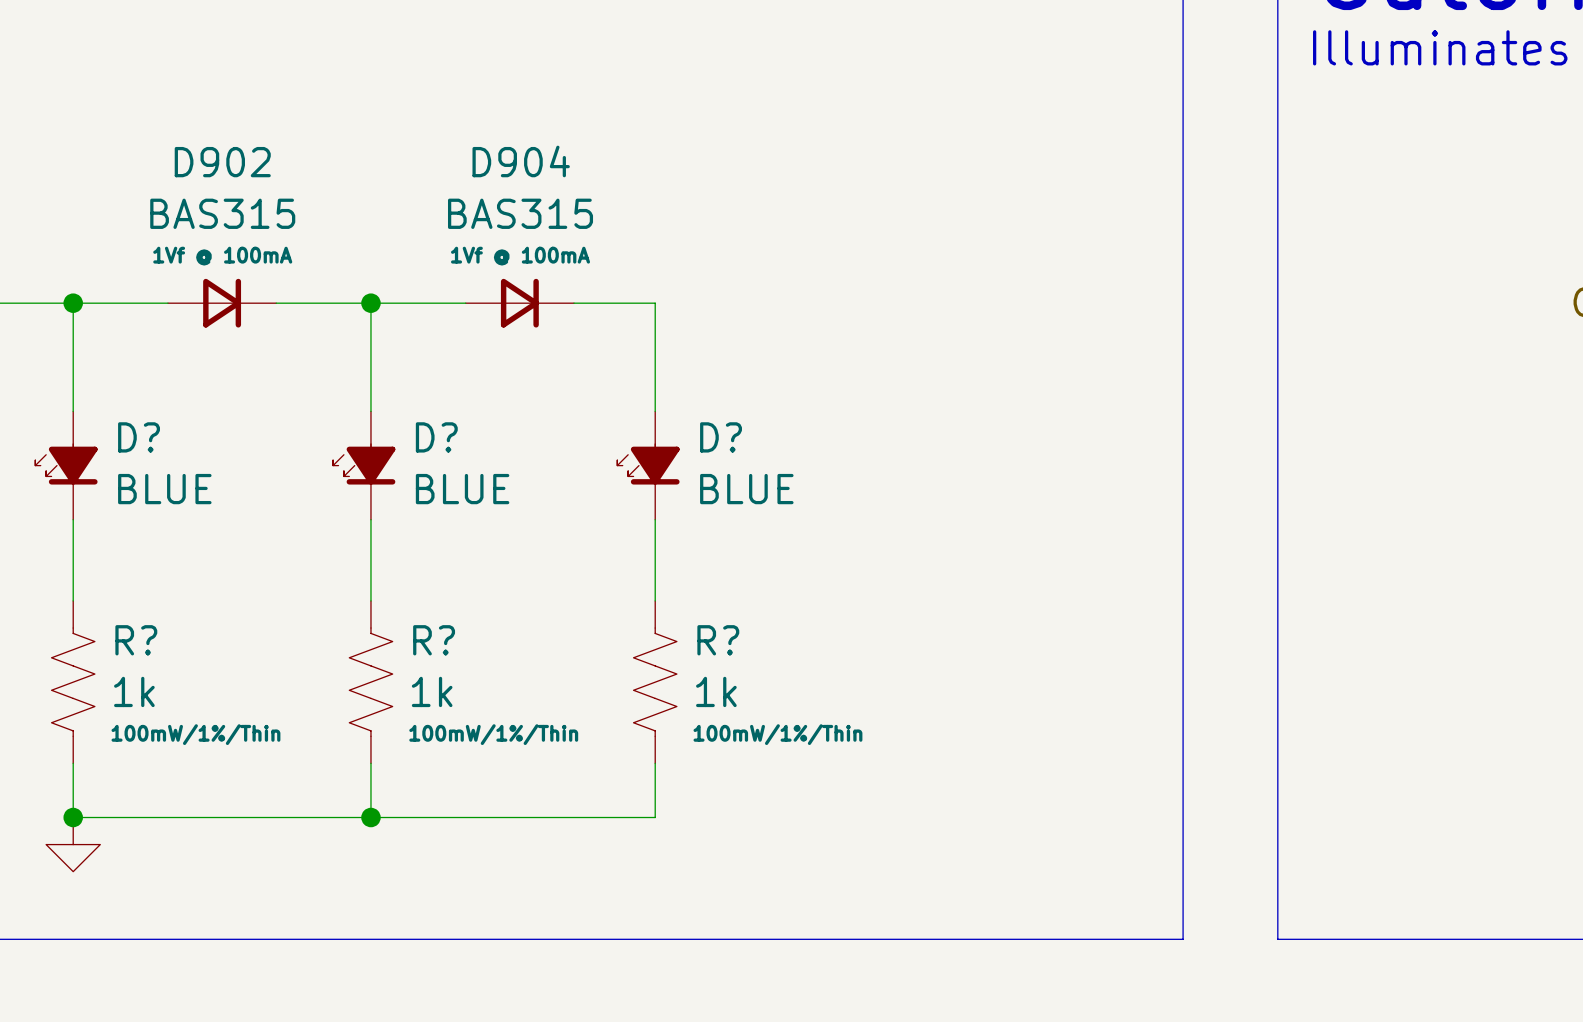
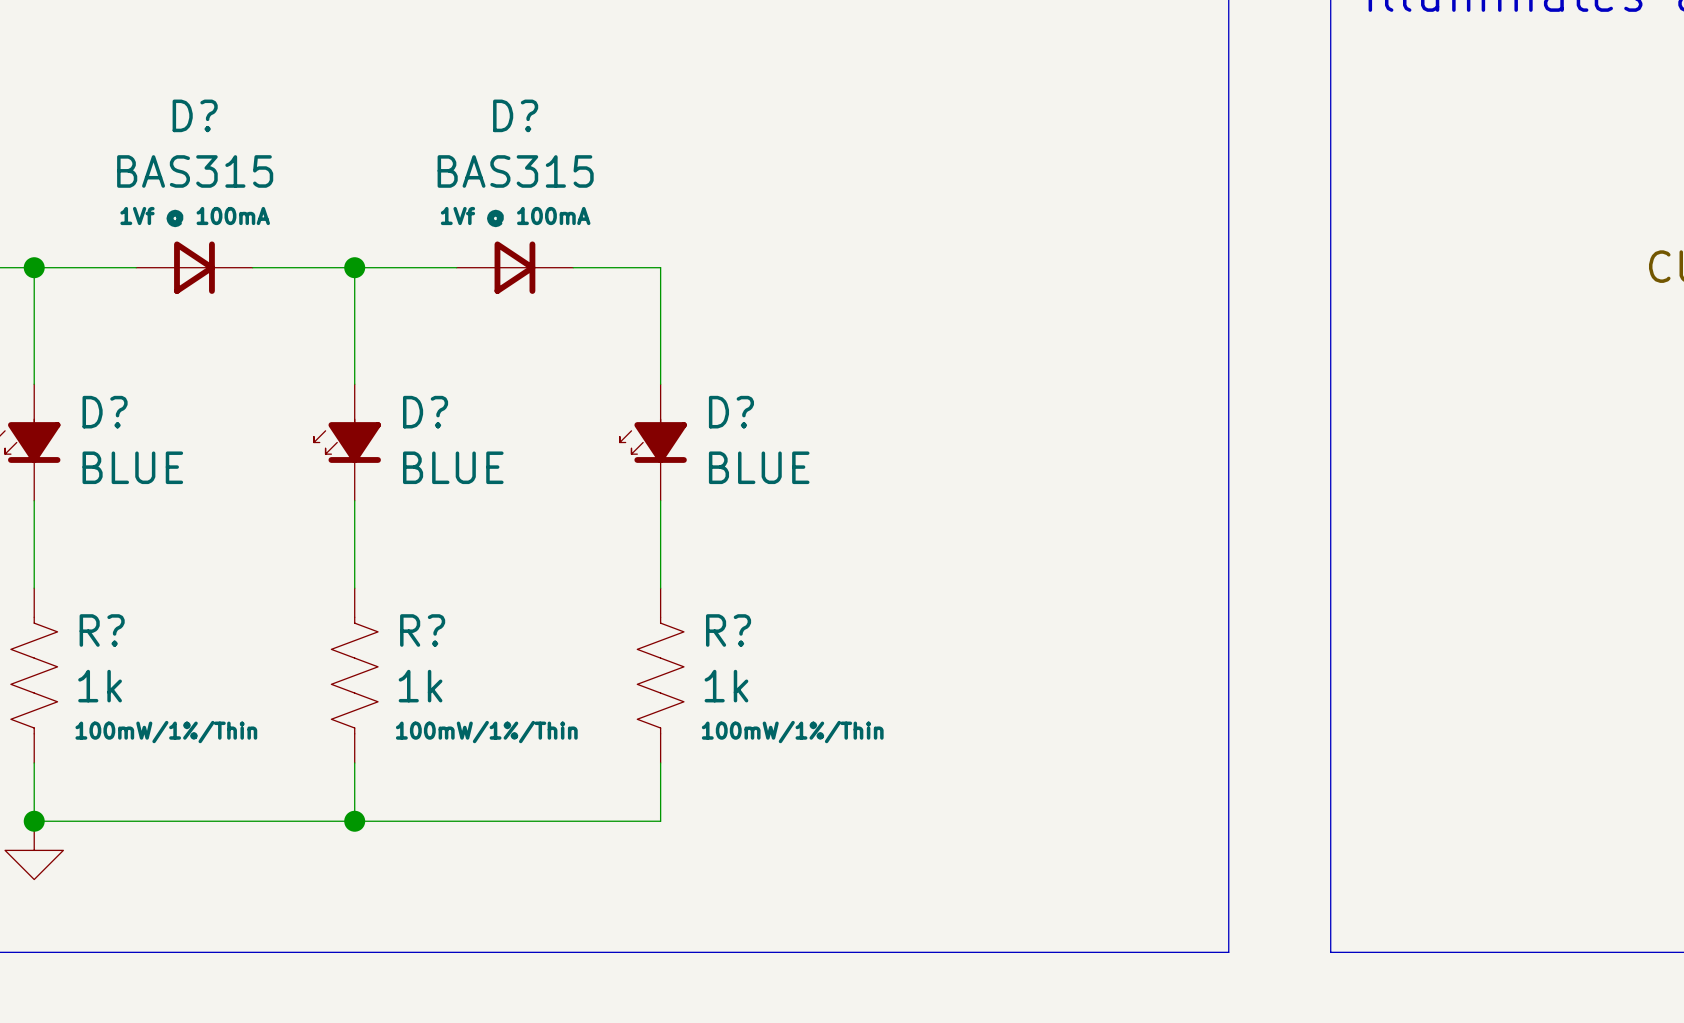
D904 name: D904 (521, 161) -> D? (515, 115)
D902 name: D902 (222, 162) -> D? (195, 115)

